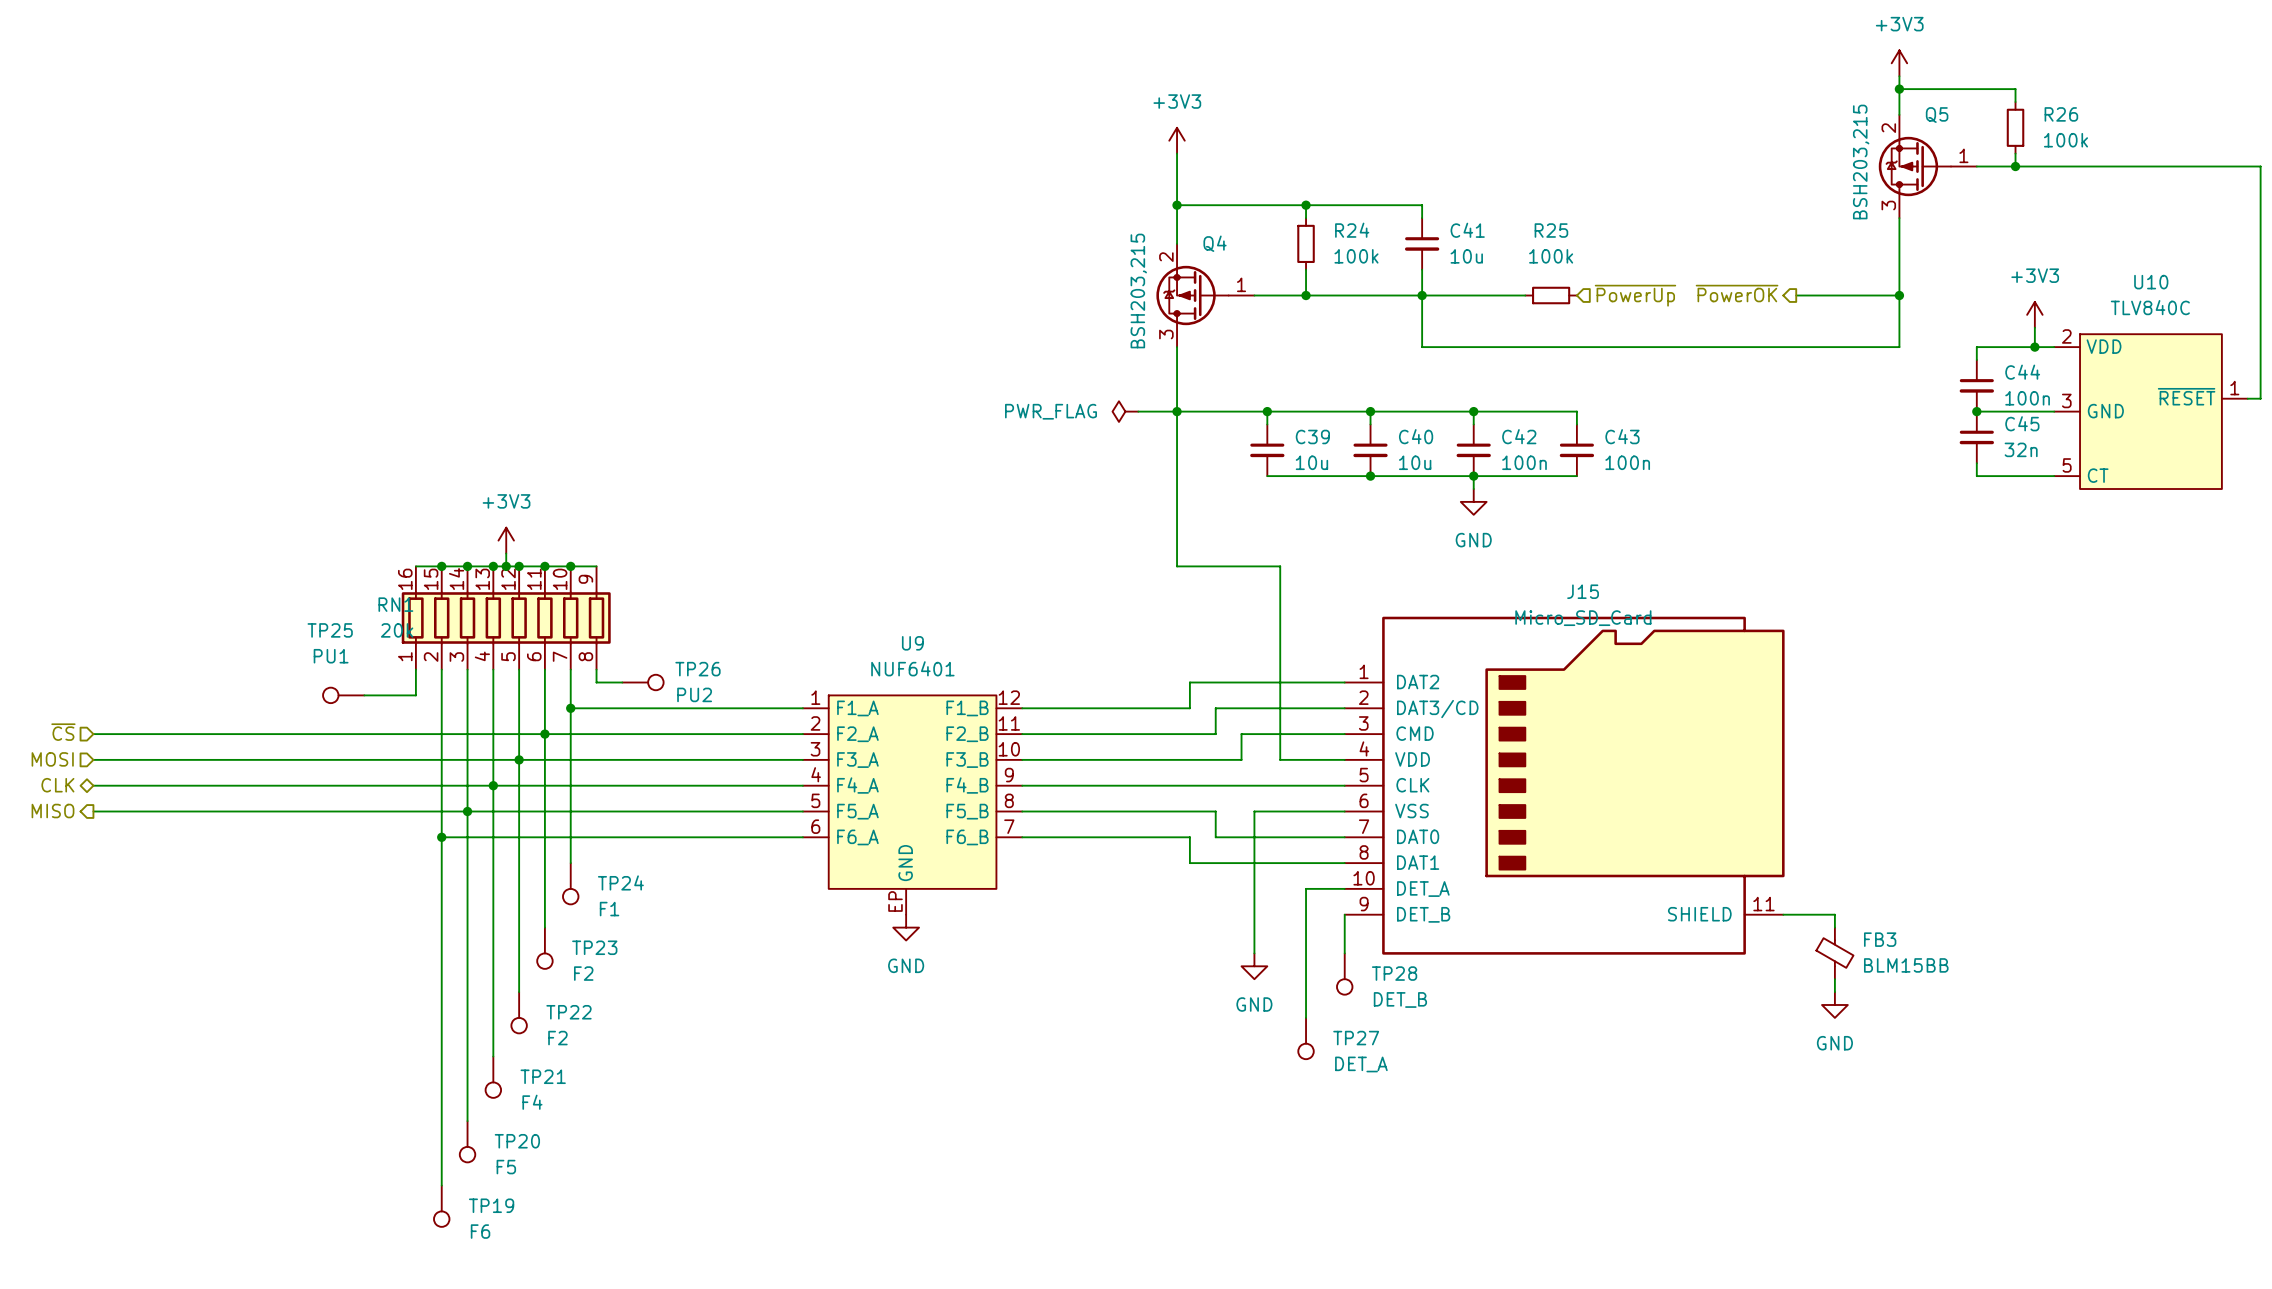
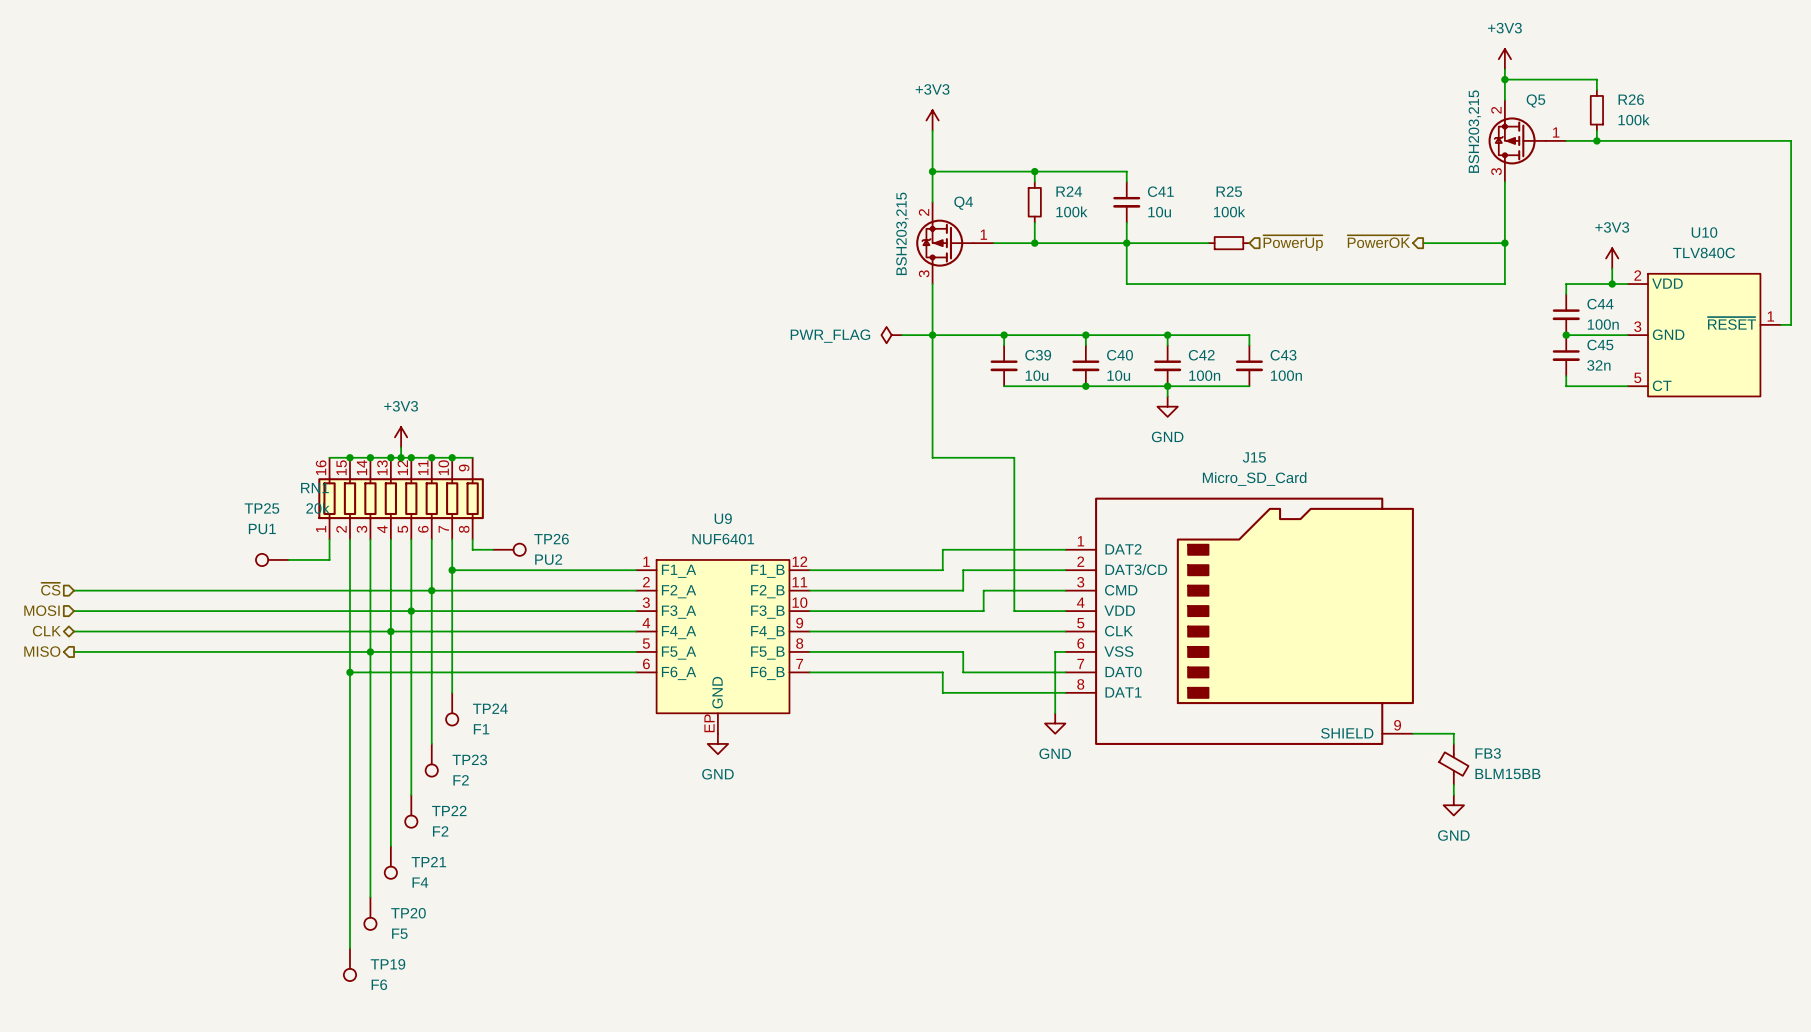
J15 symbol: [1344, 616, 1785, 955] -> [1065, 497, 1414, 745]
wire: (1331, 811) (1254, 811) (1254, 953) -> (1055, 651) (1055, 713)
wire: (1344, 888) (1306, 888) (1306, 1017) -> none
wire: (1344, 914) (1344, 953) -> none
power symbol position: GND (1254, 966) -> GND (1055, 723)
TP28: DET_B (1344, 974) -> none
TP27: DET_A (1306, 1038) -> none

